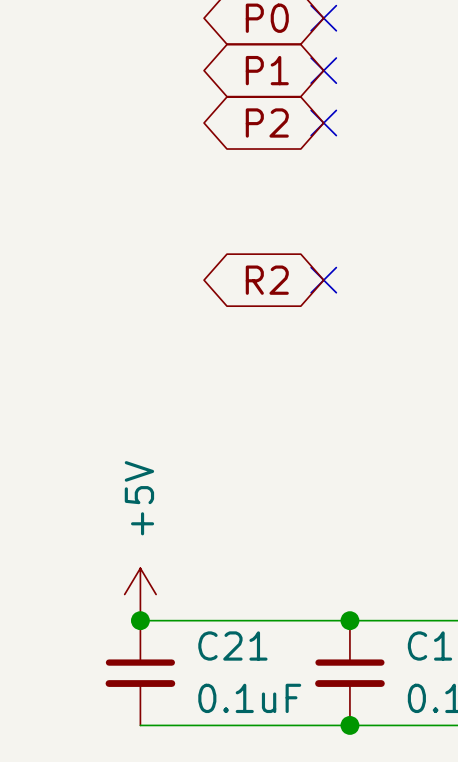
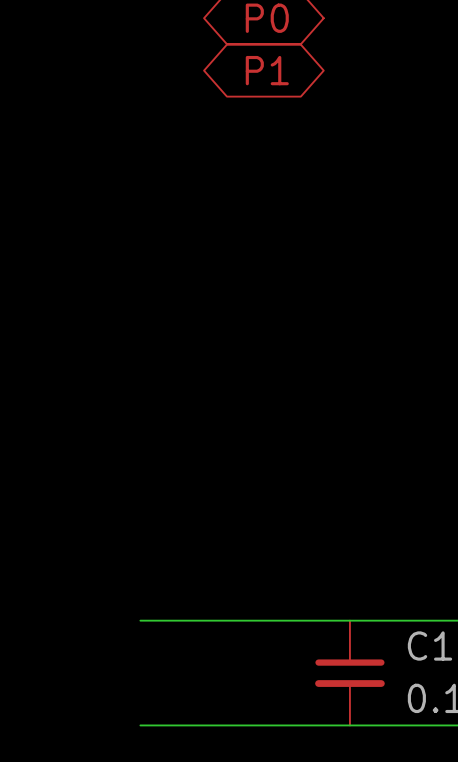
no-connect mark: (323, 18) -> none
no-connect mark: (323, 70) -> none
global label: P2 (267, 122) -> none
no-connect mark: (323, 122) -> none
global label: R2 (267, 280) -> none
no-connect mark: (323, 280) -> none
power symbol: +5V (140, 594) -> none
junction: (140, 620) -> none
junction: (349, 620) -> none
C21: 0.1uF (140, 673) -> none
junction: (349, 725) -> none

